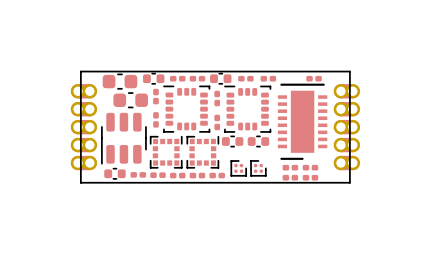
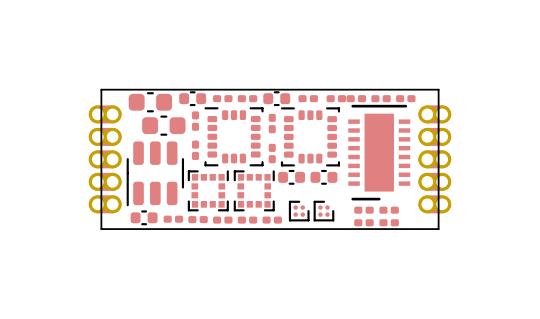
part: none -> (356, 98)
part: none -> (381, 98)
part: (314, 78) -> none
part: none -> (405, 98)

